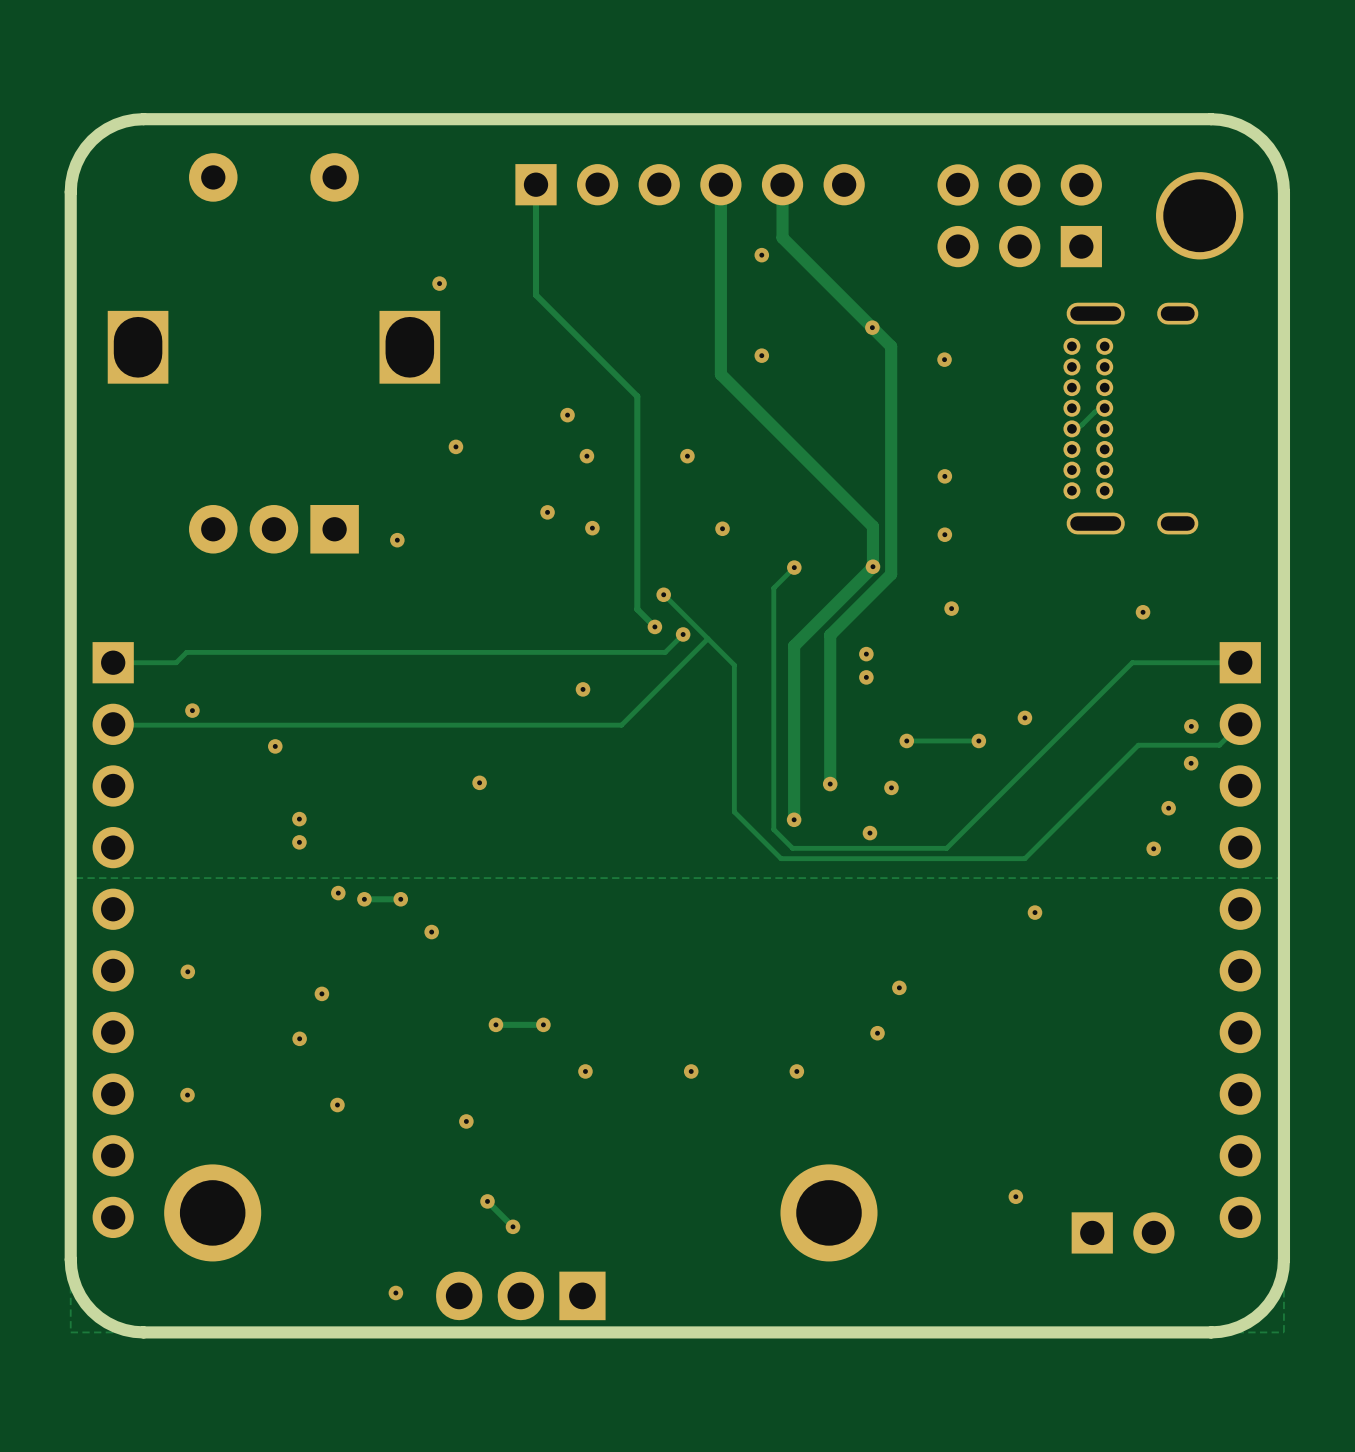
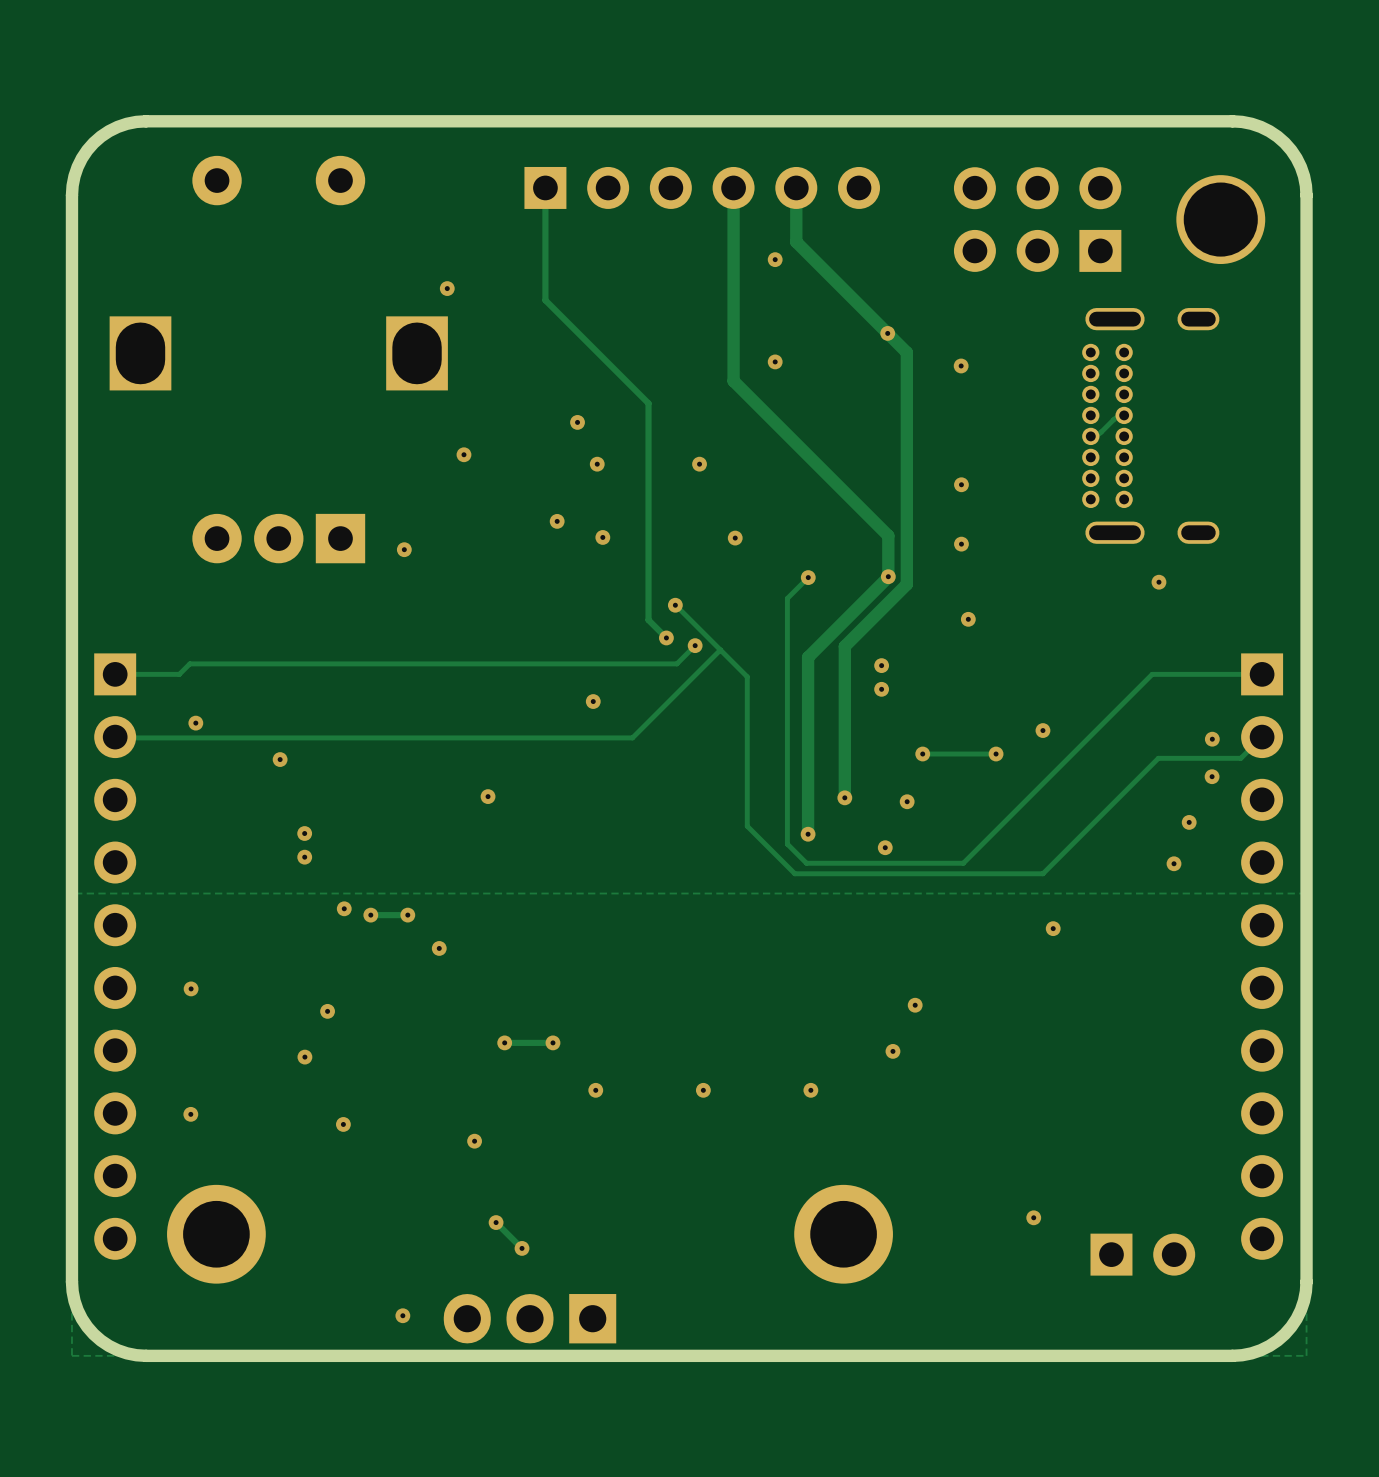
via position: (1143, 612) -> (1158, 582)

